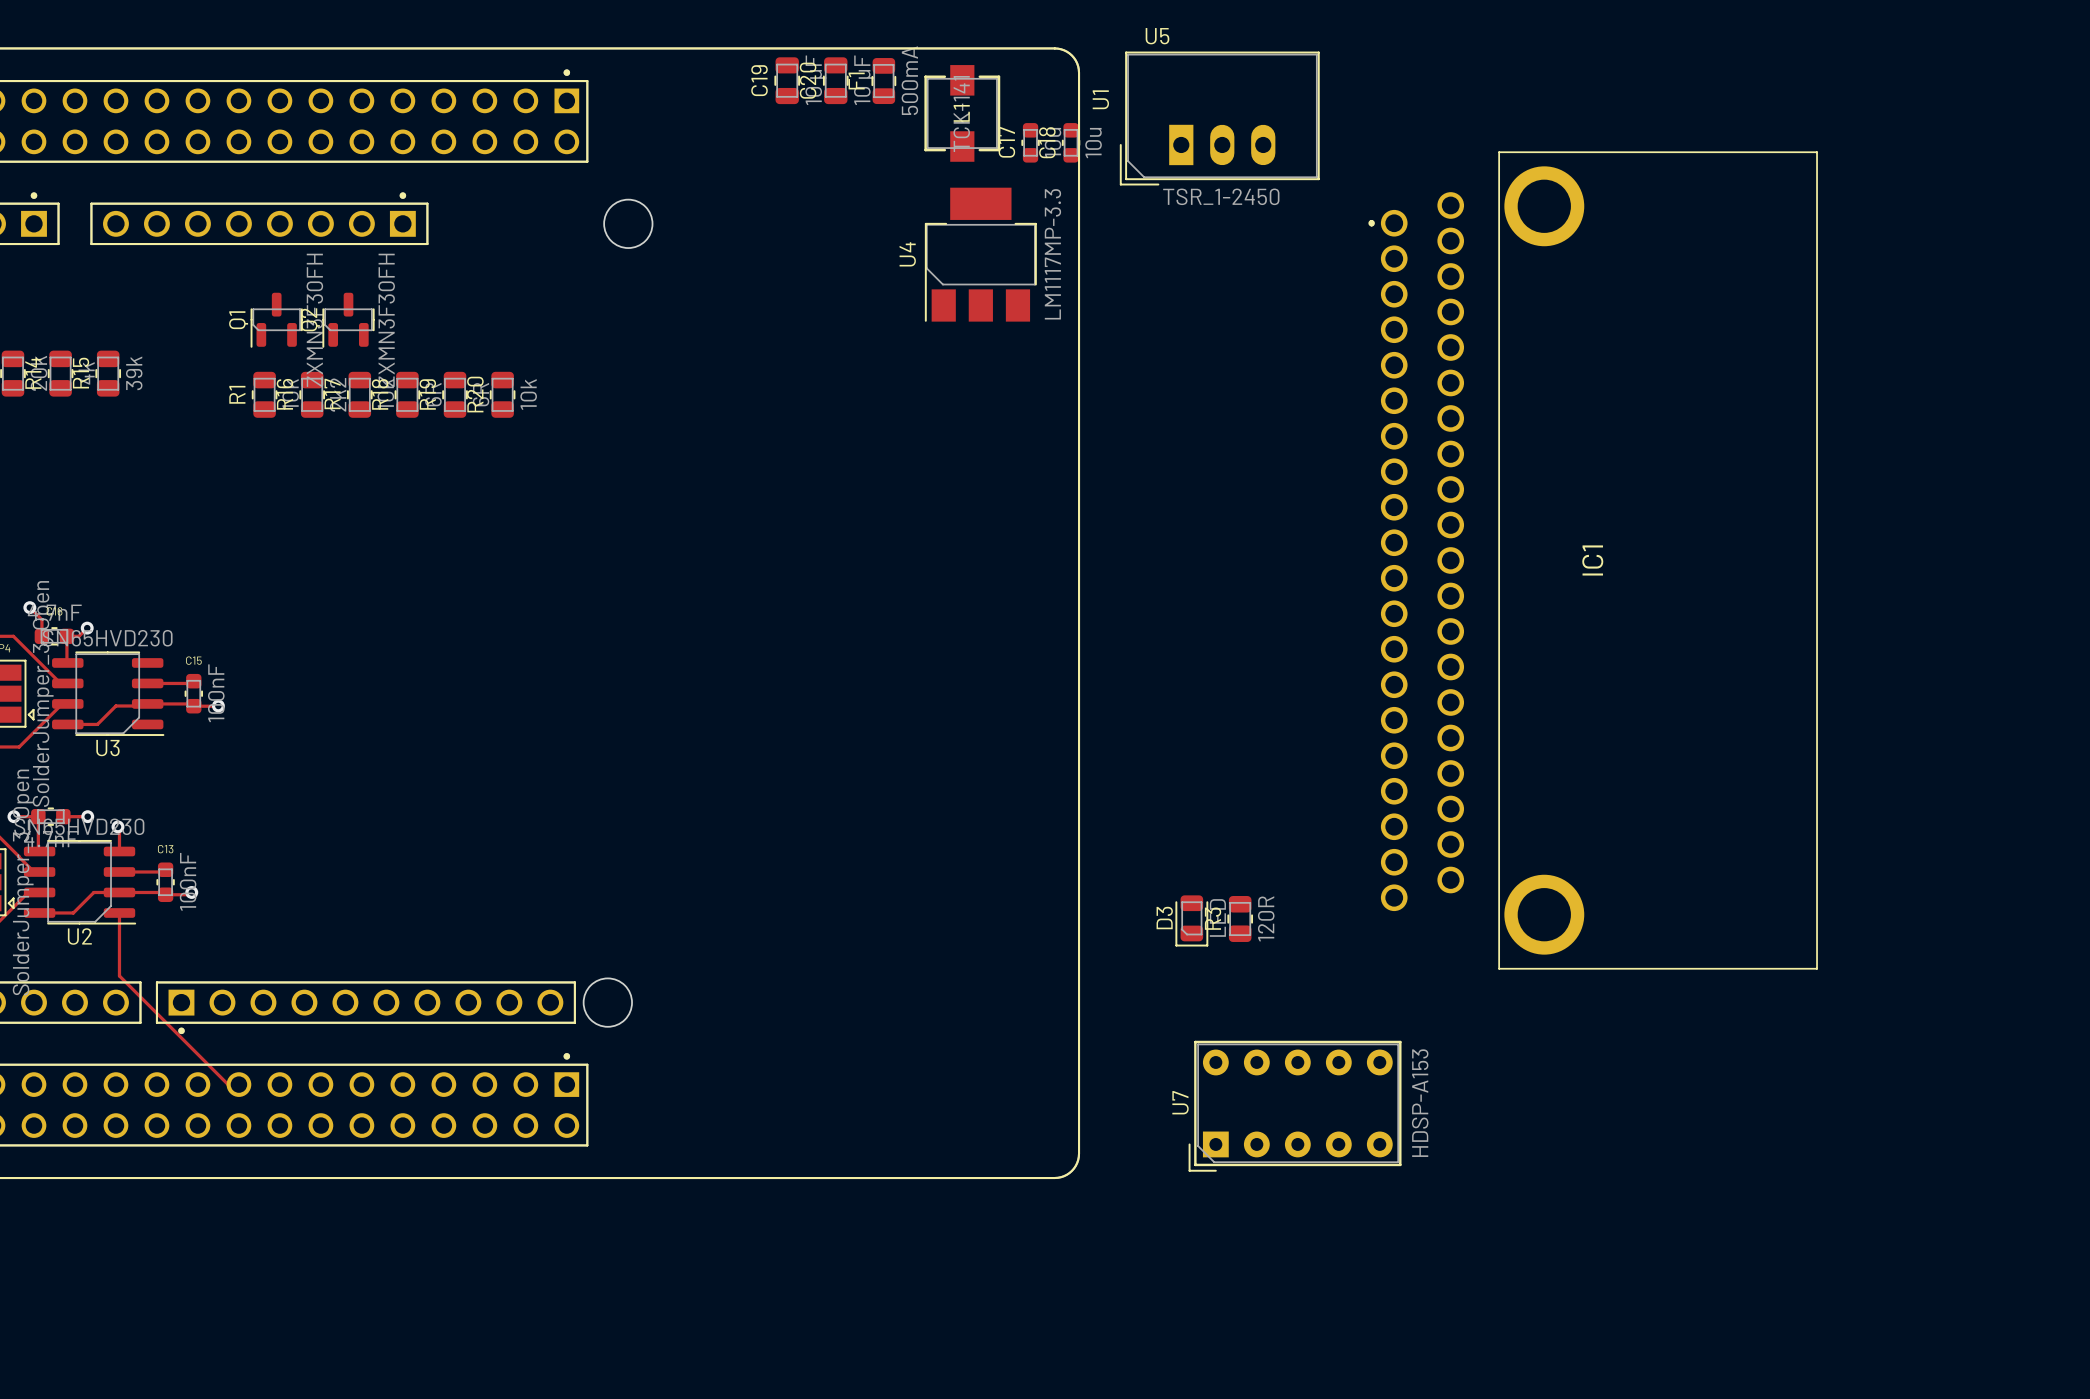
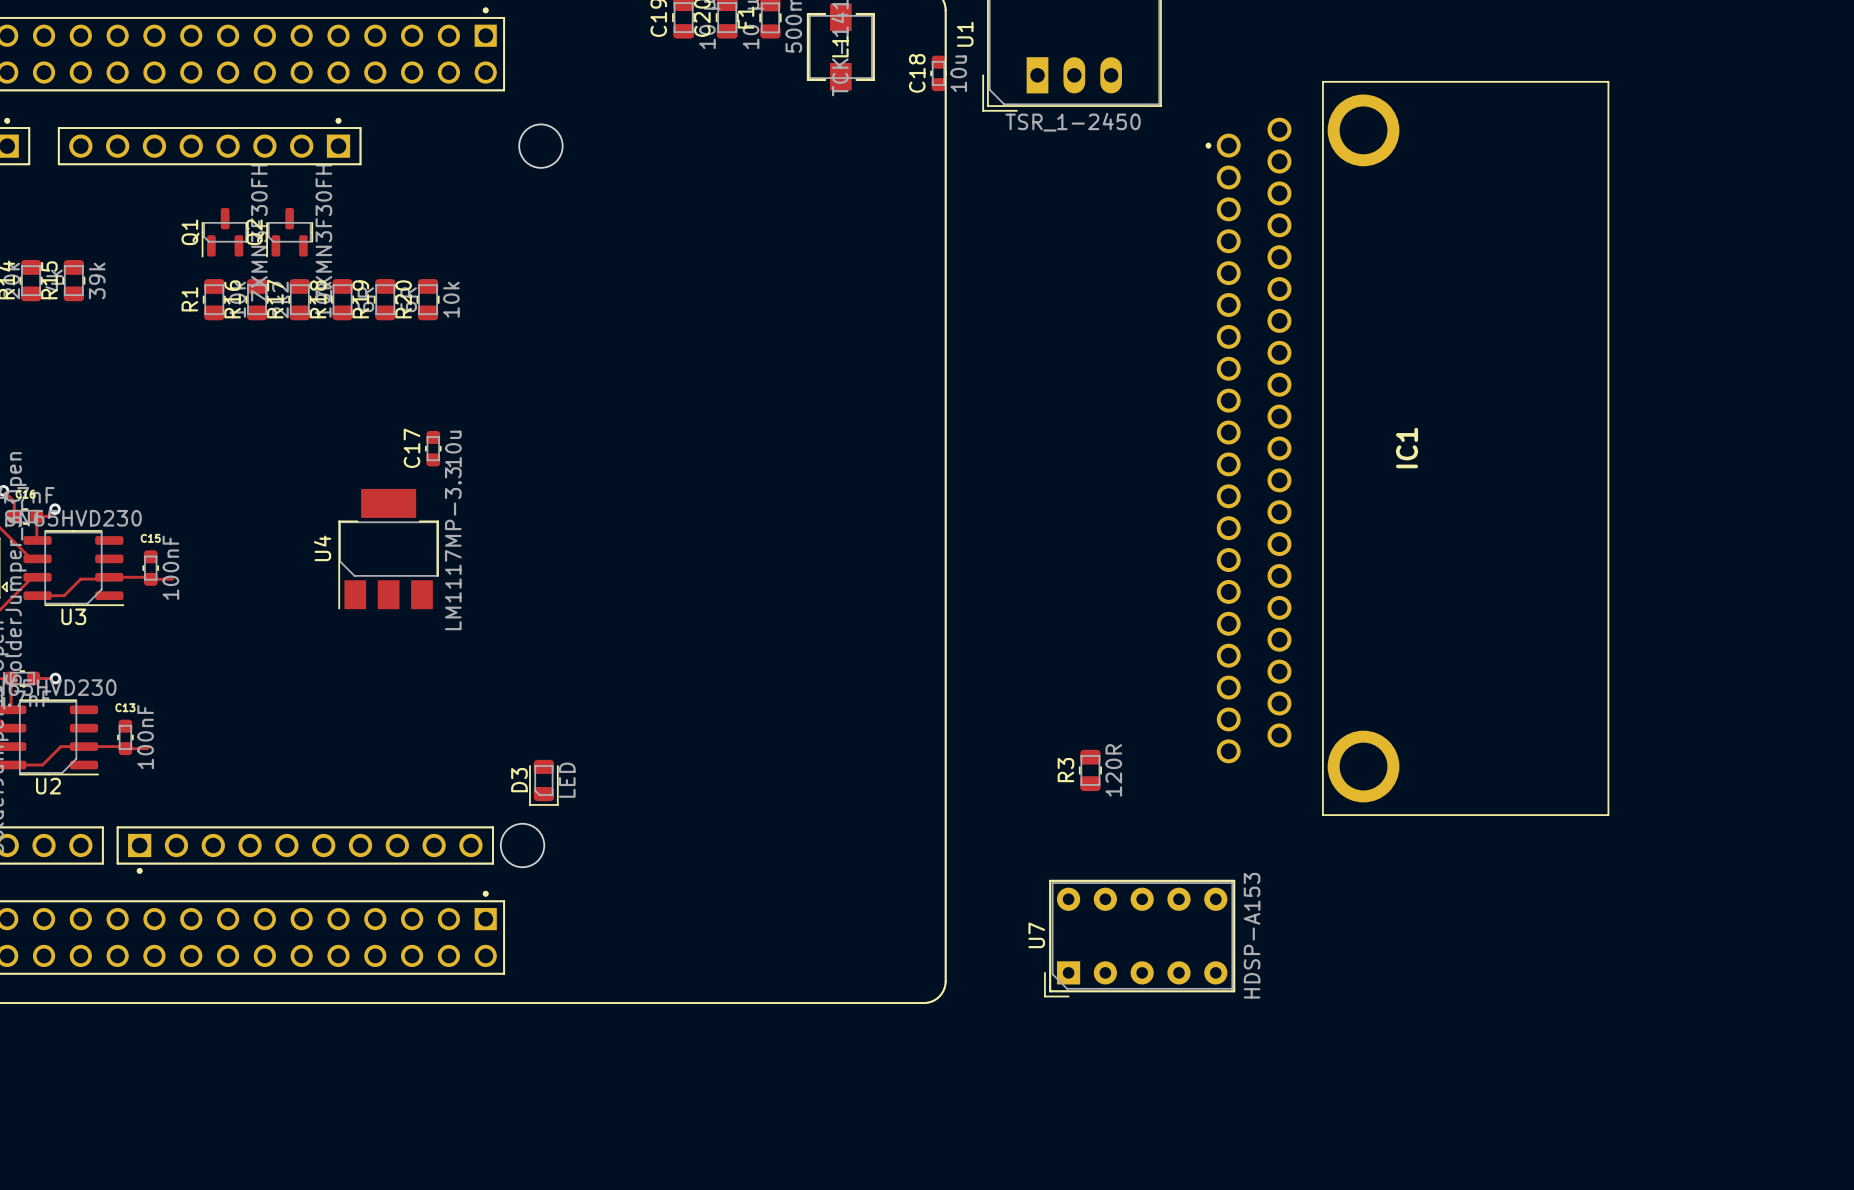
C17 position: (1030, 142) -> (433, 448)
U4 position: (980, 254) -> (388, 549)
track: (193, 681) (191, 683) (147, 683) -> none
via: (218, 705) -> none
track: (117, 826) (119, 851) -> none
via: (117, 826) -> none
track: (165, 869) (163, 871) (119, 871) -> none
via: (191, 892) -> none
track: (119, 912) (119, 975) (228, 1084) (238, 1084) -> none
D3 position: (1191, 920) -> (543, 782)

